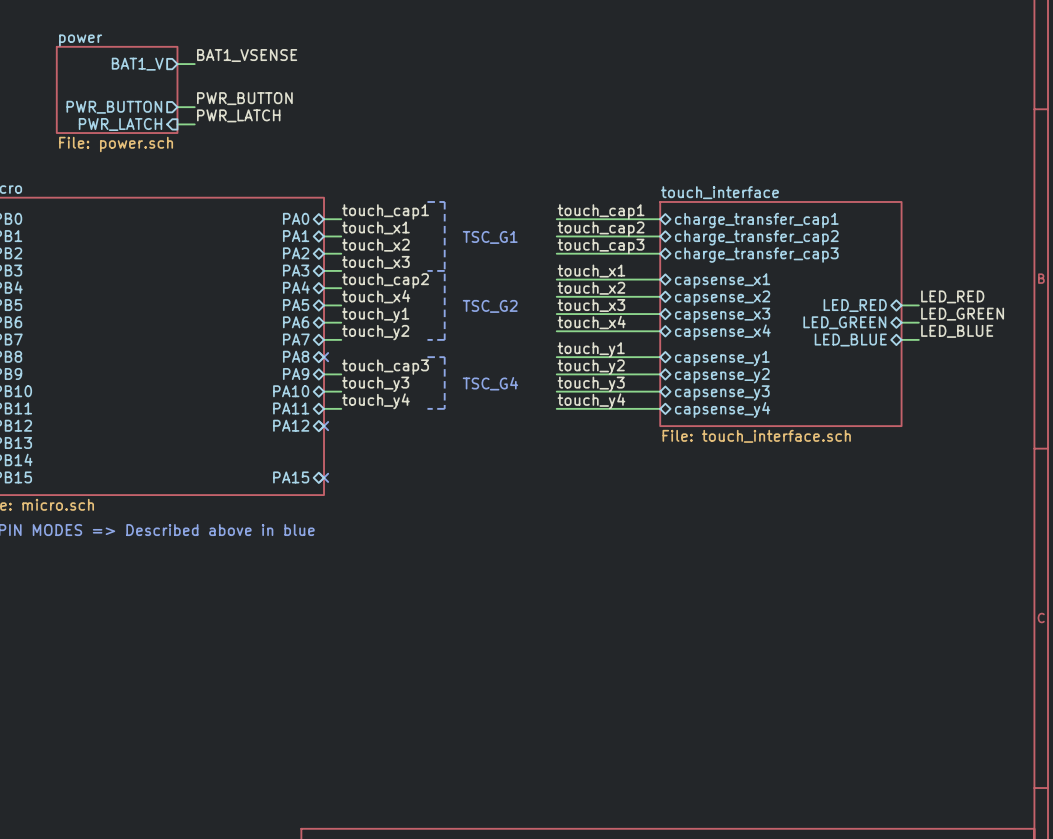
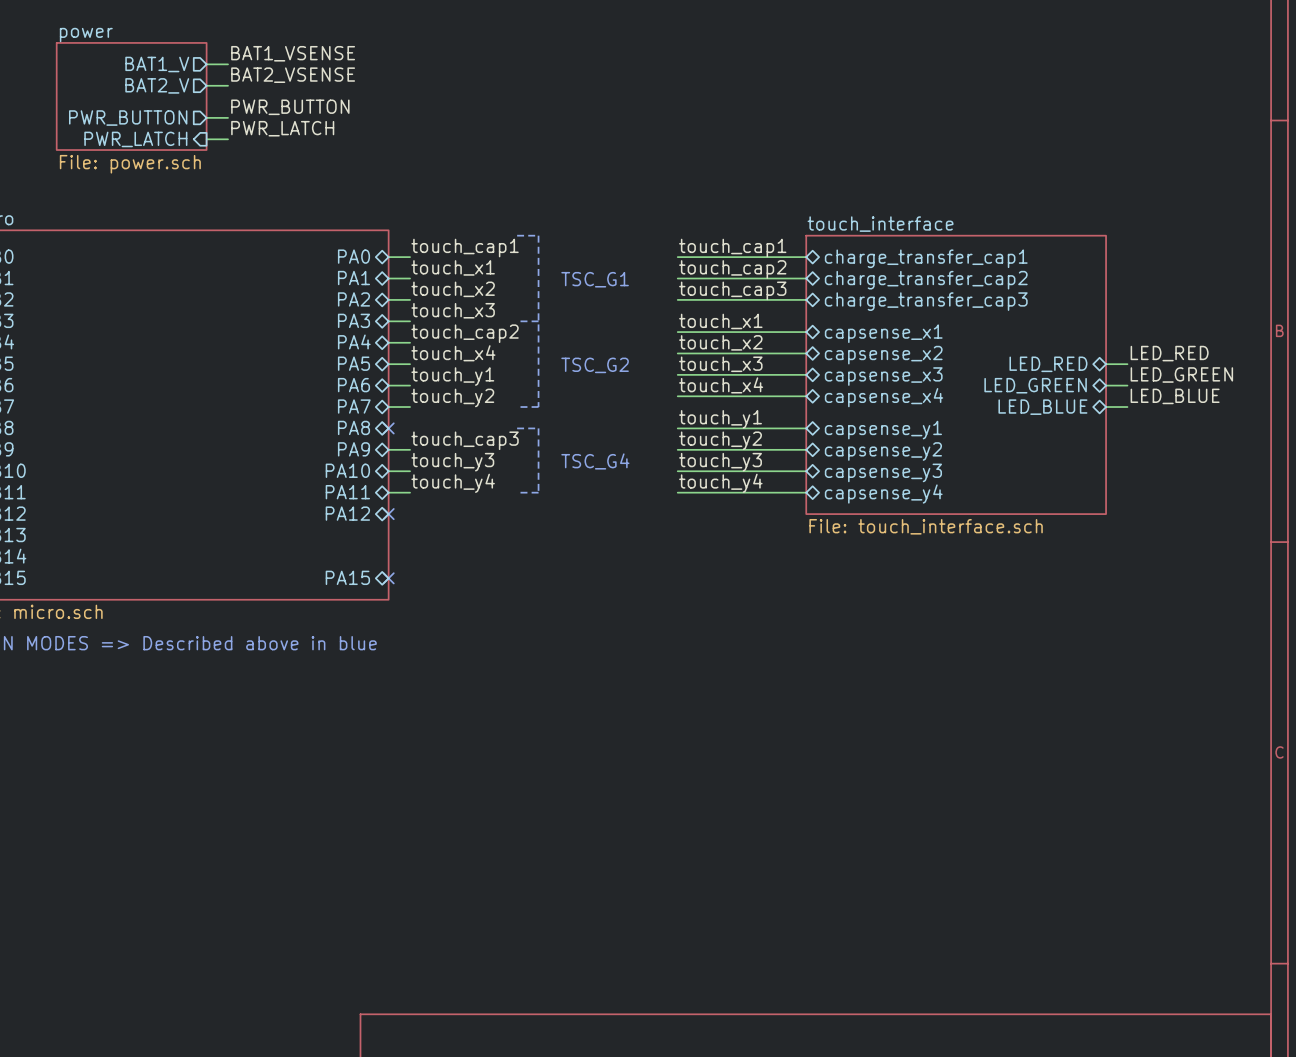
label: none -> BAT2_VSENSE (293, 75)
sheet pin: none -> BAT2_V (157, 85)
wire: none -> (206, 85) (228, 85)

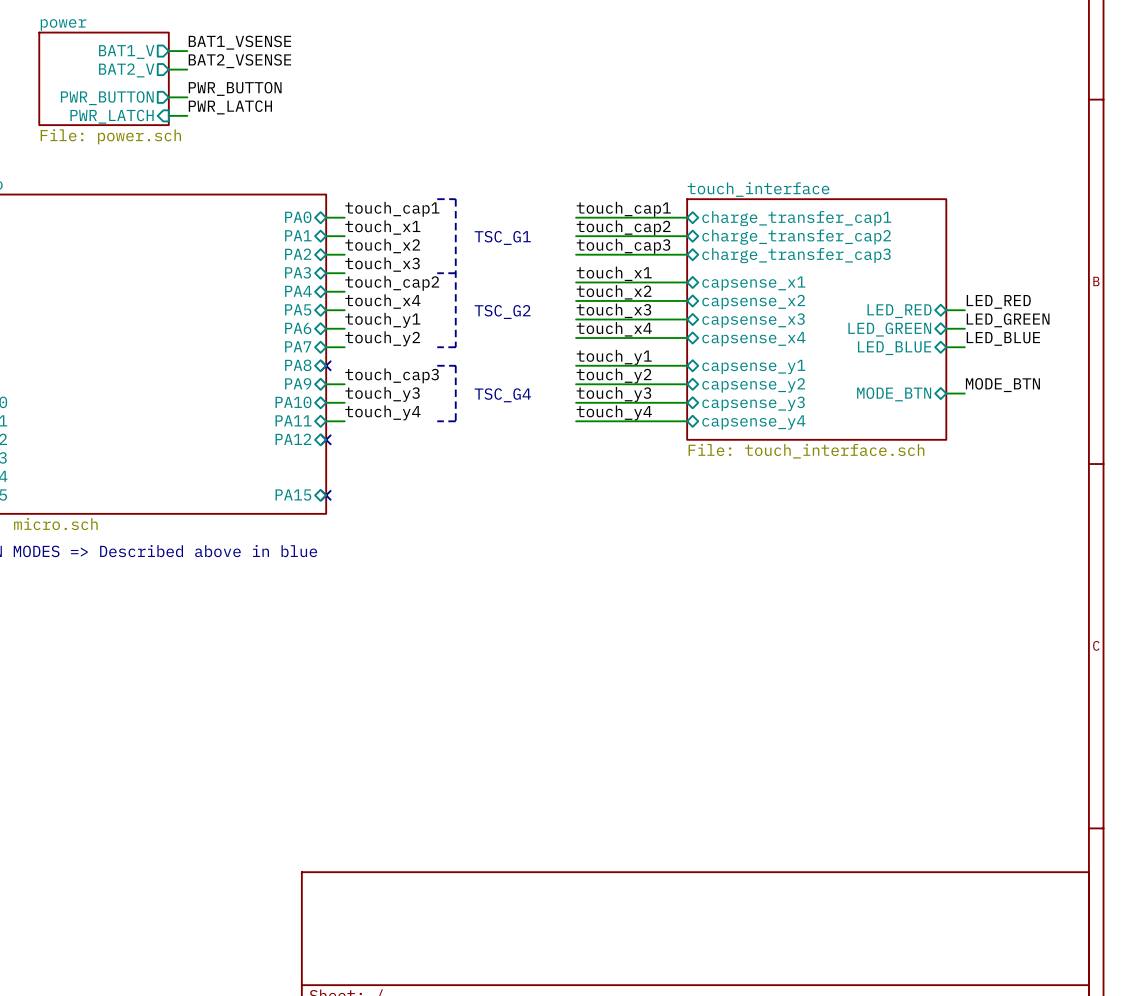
label: none -> MODE_BTN (1002, 385)
sheet pin: none -> MODE_BTN (894, 394)
wire: none -> (946, 393) (964, 393)

